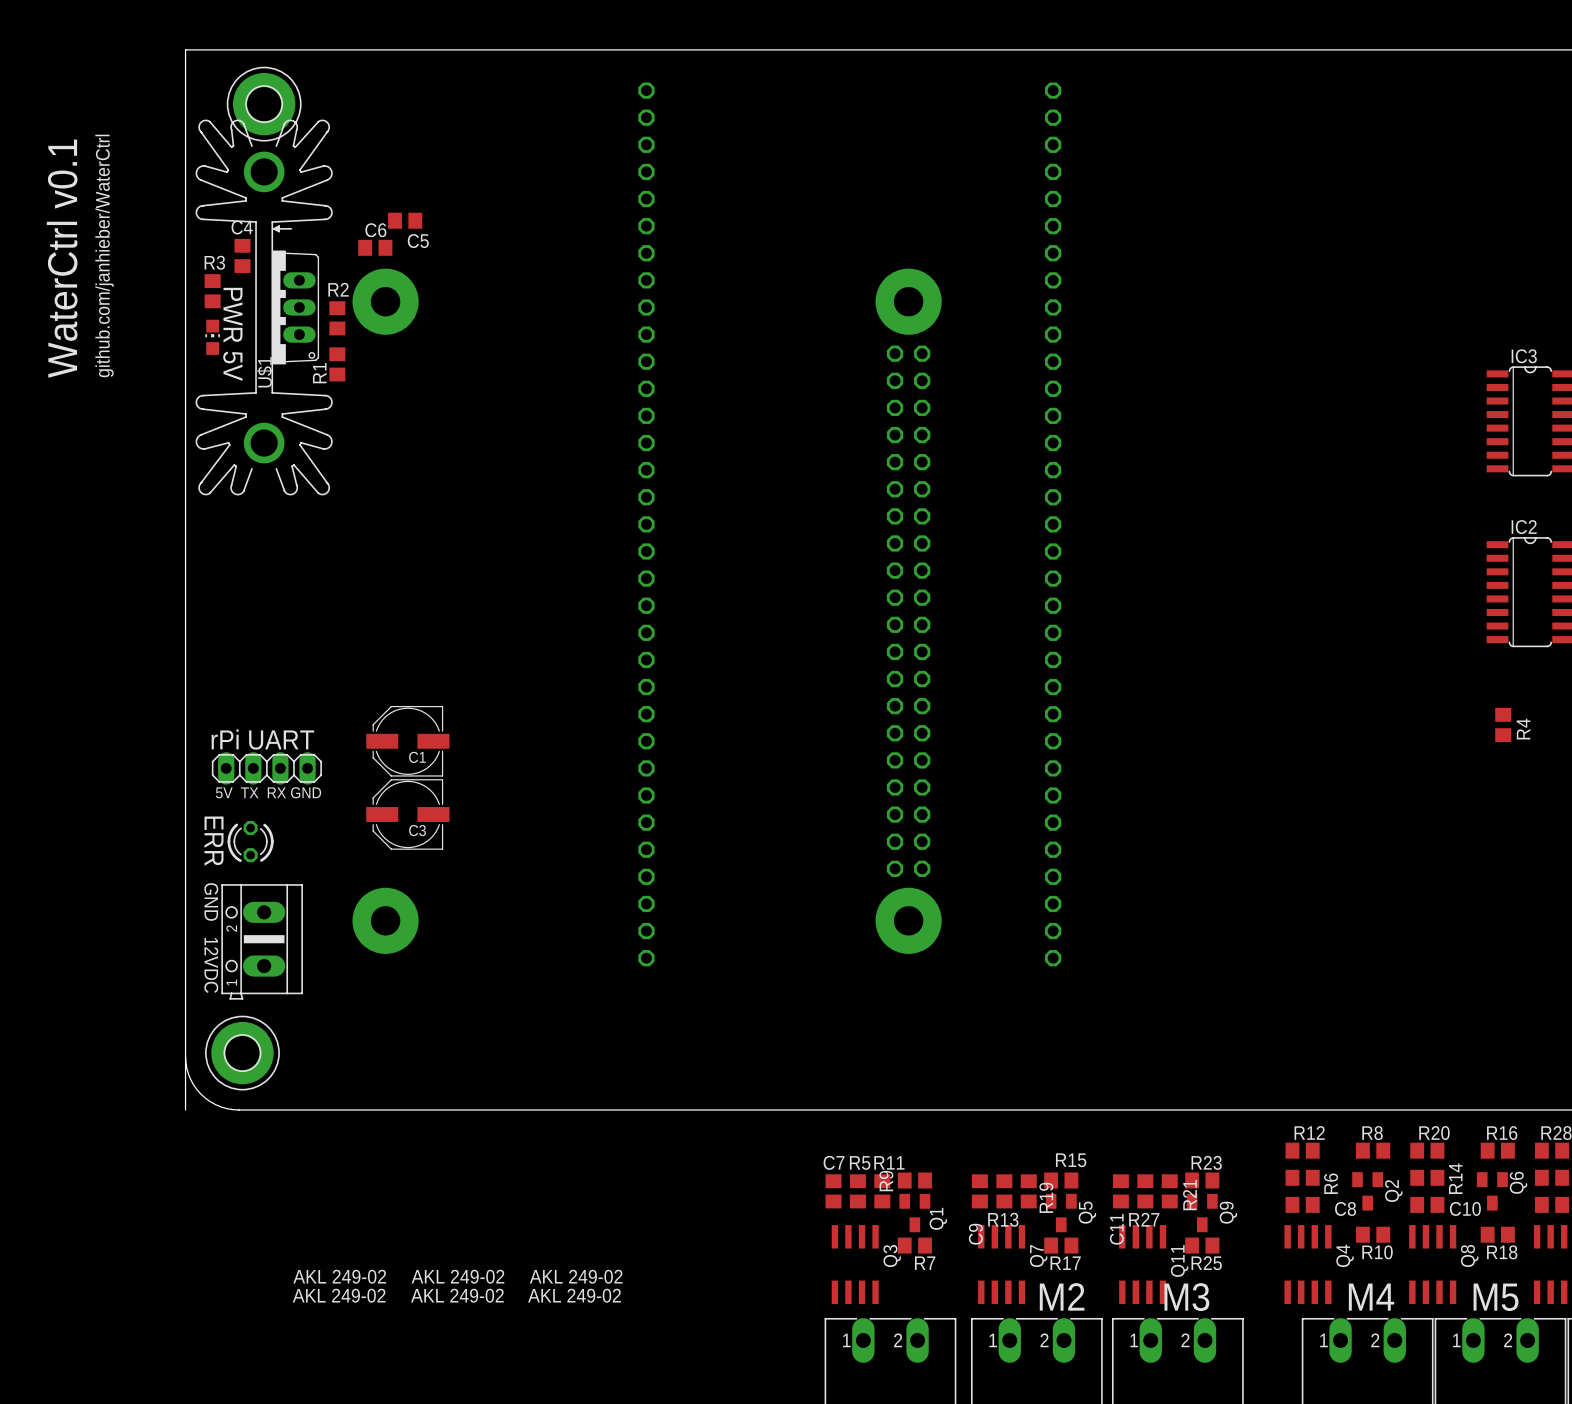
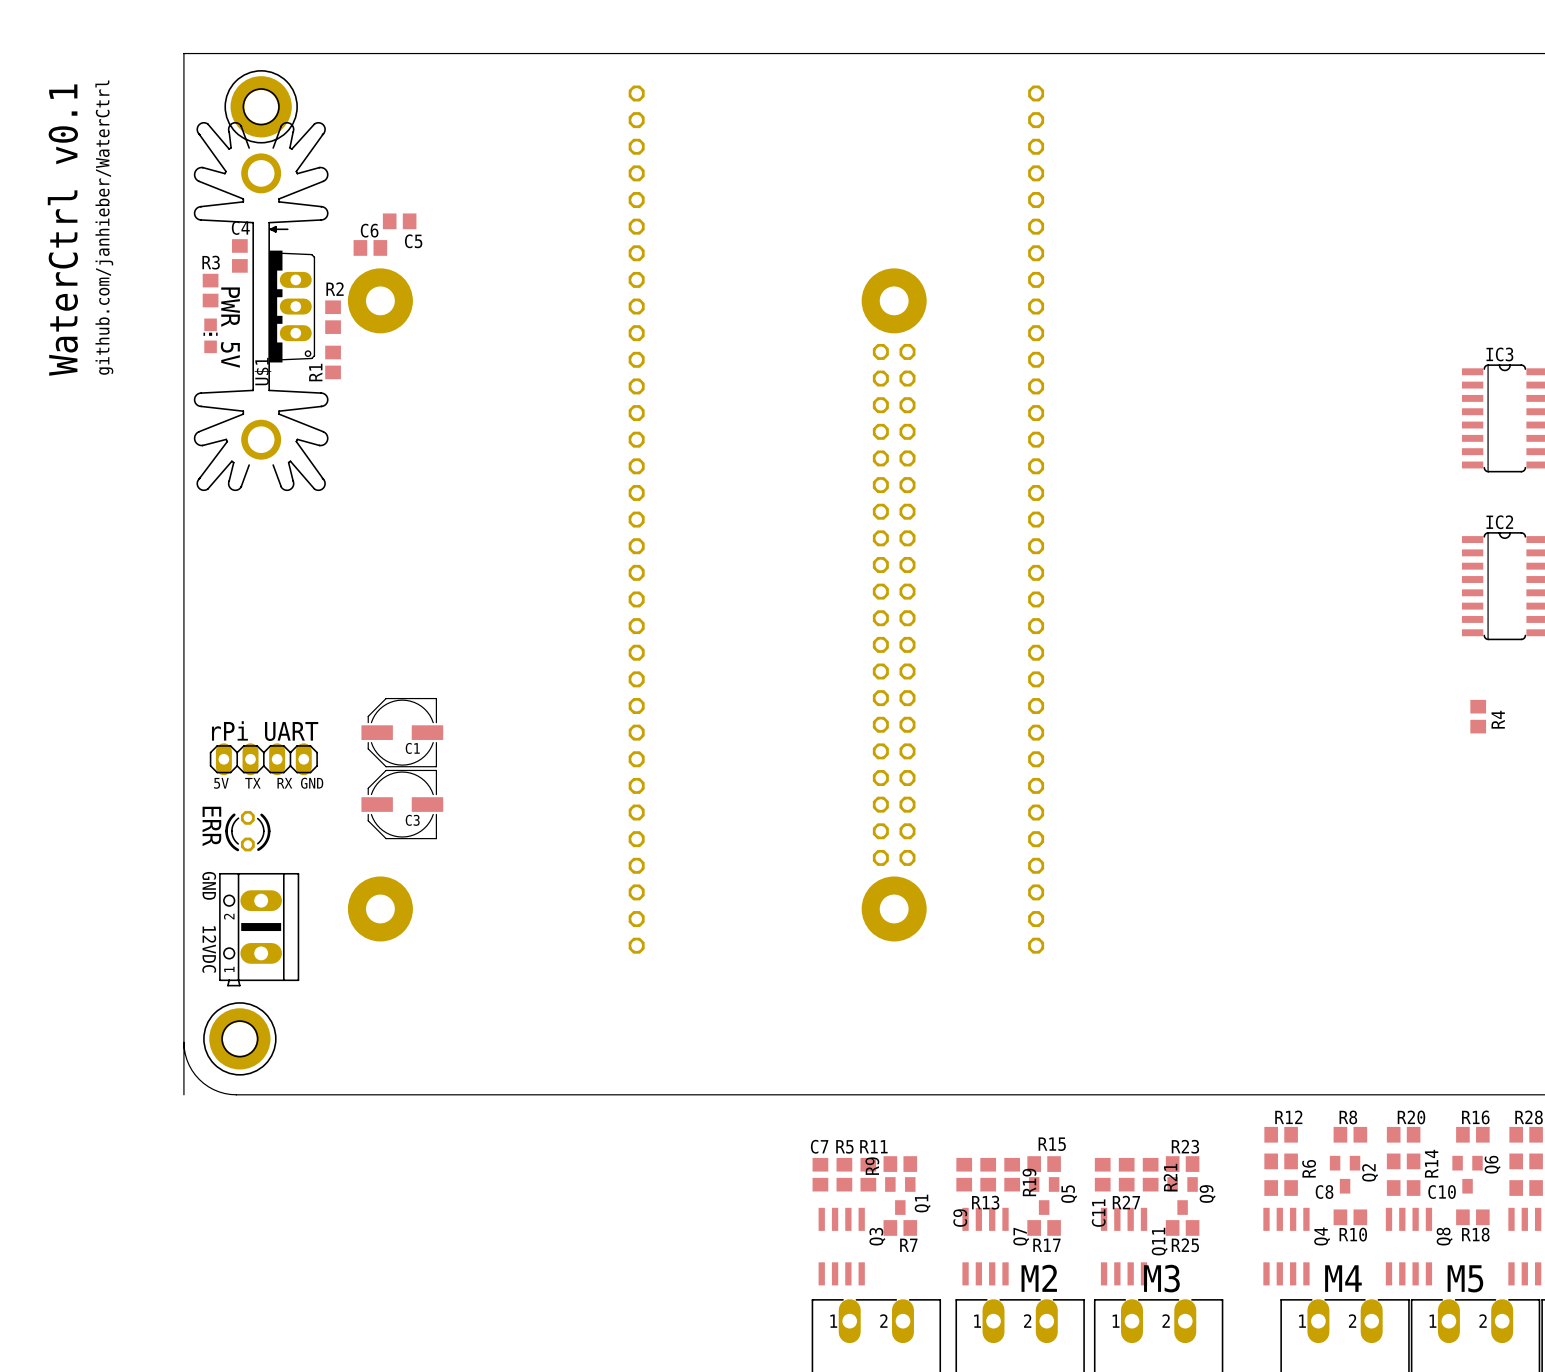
drawing: [292, 1269, 623, 1303] -> none

